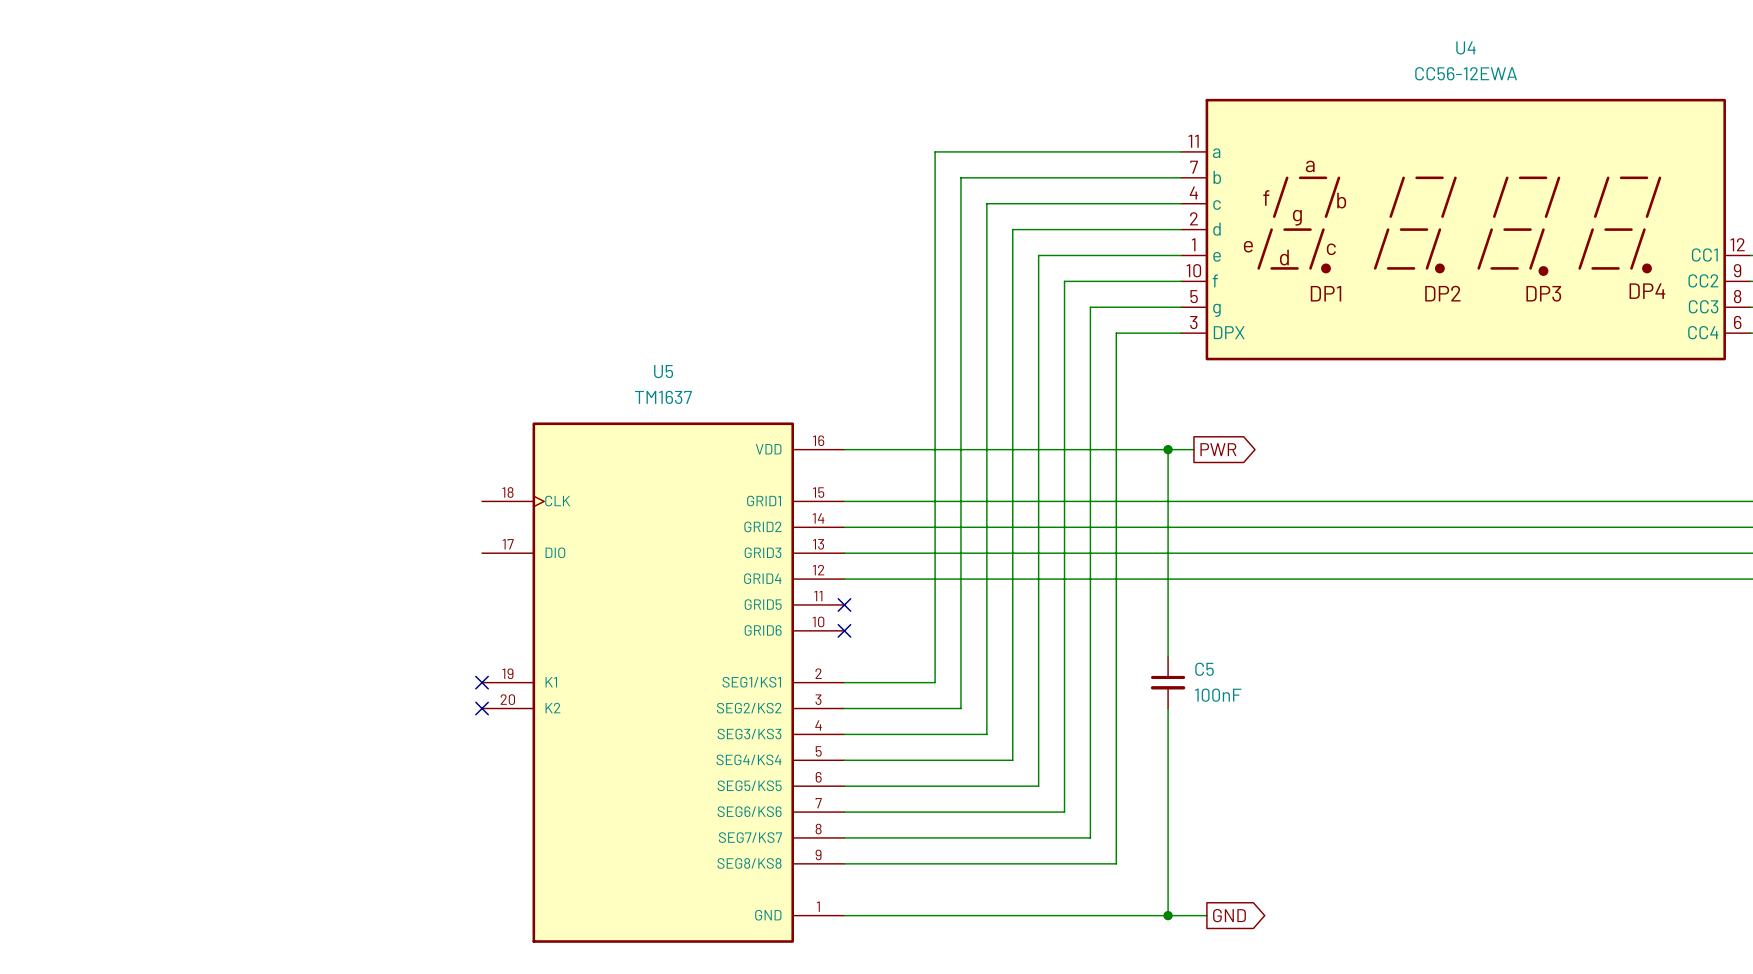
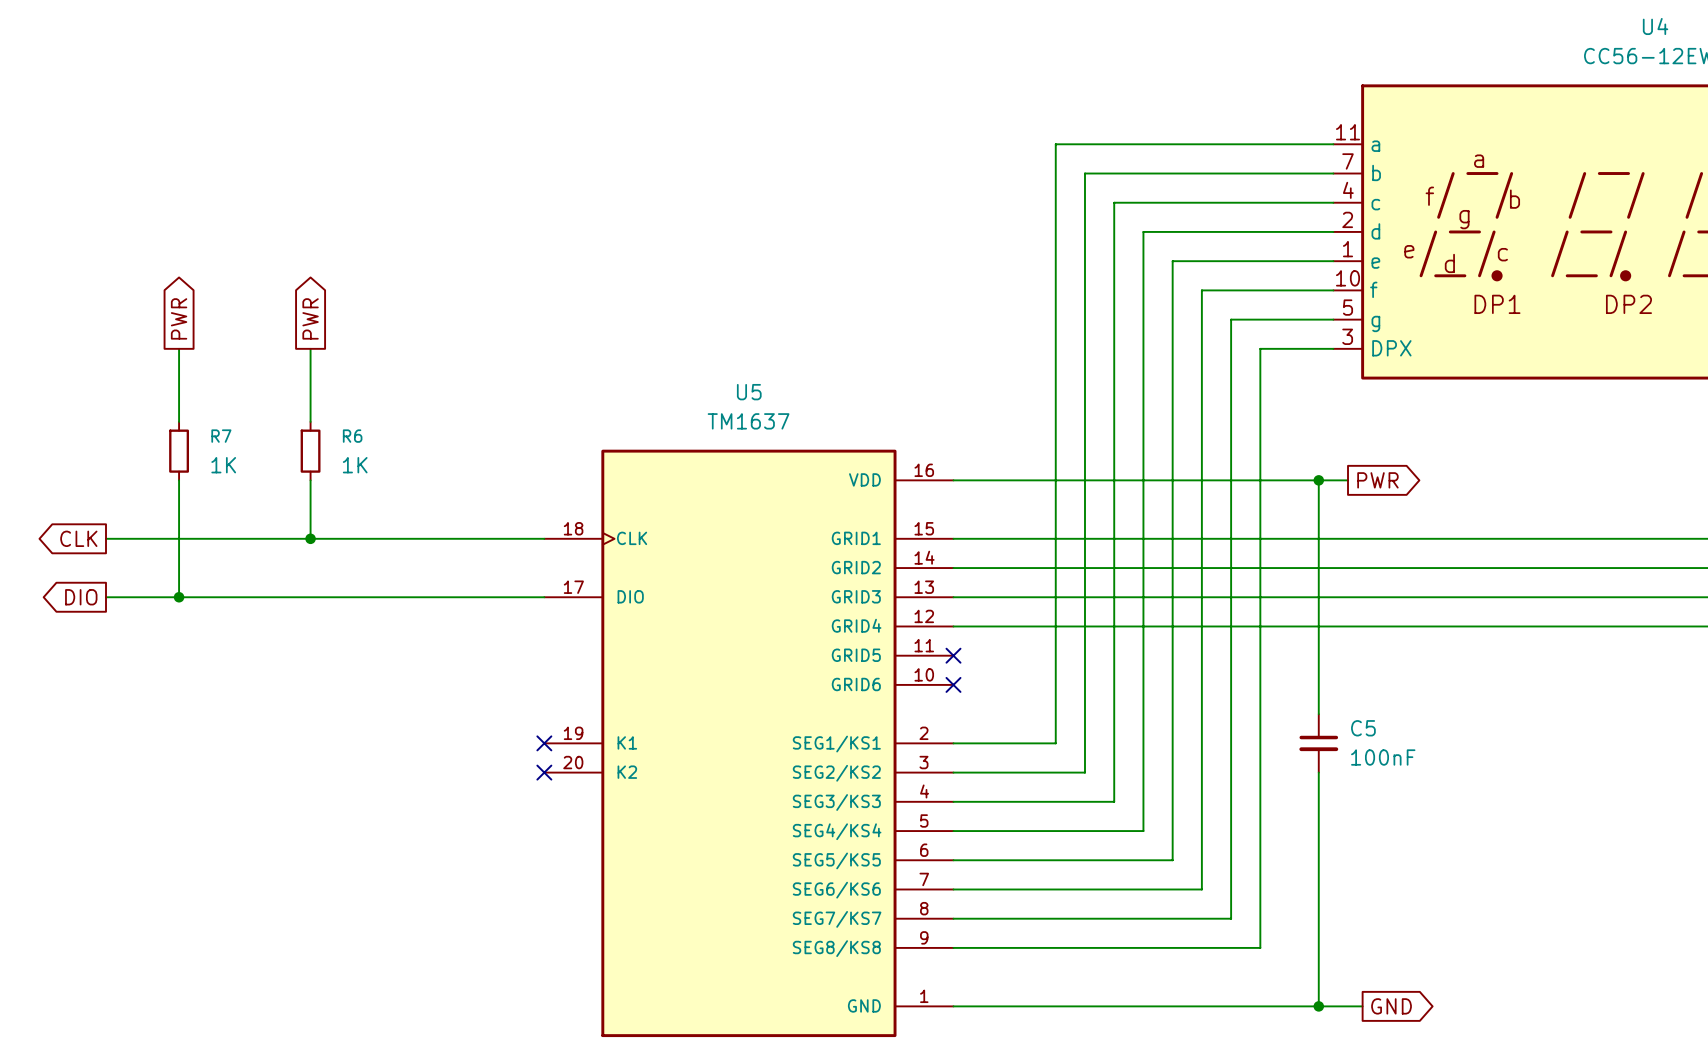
global label: none -> PWR (179, 318)
global label: none -> PWR (310, 318)
wire: none -> (179, 348) (179, 421)
wire: none -> (310, 348) (310, 421)
R7: none -> 1K (179, 451)
R6: none -> 1K (310, 451)
wire: none -> (179, 480) (179, 597)
wire: none -> (310, 480) (310, 538)
global label: none -> CLK (78, 538)
wire: none -> (106, 538) (544, 538)
junction: none -> (310, 538)
global label: none -> DIO (81, 597)
wire: none -> (106, 597) (544, 597)
junction: none -> (179, 597)

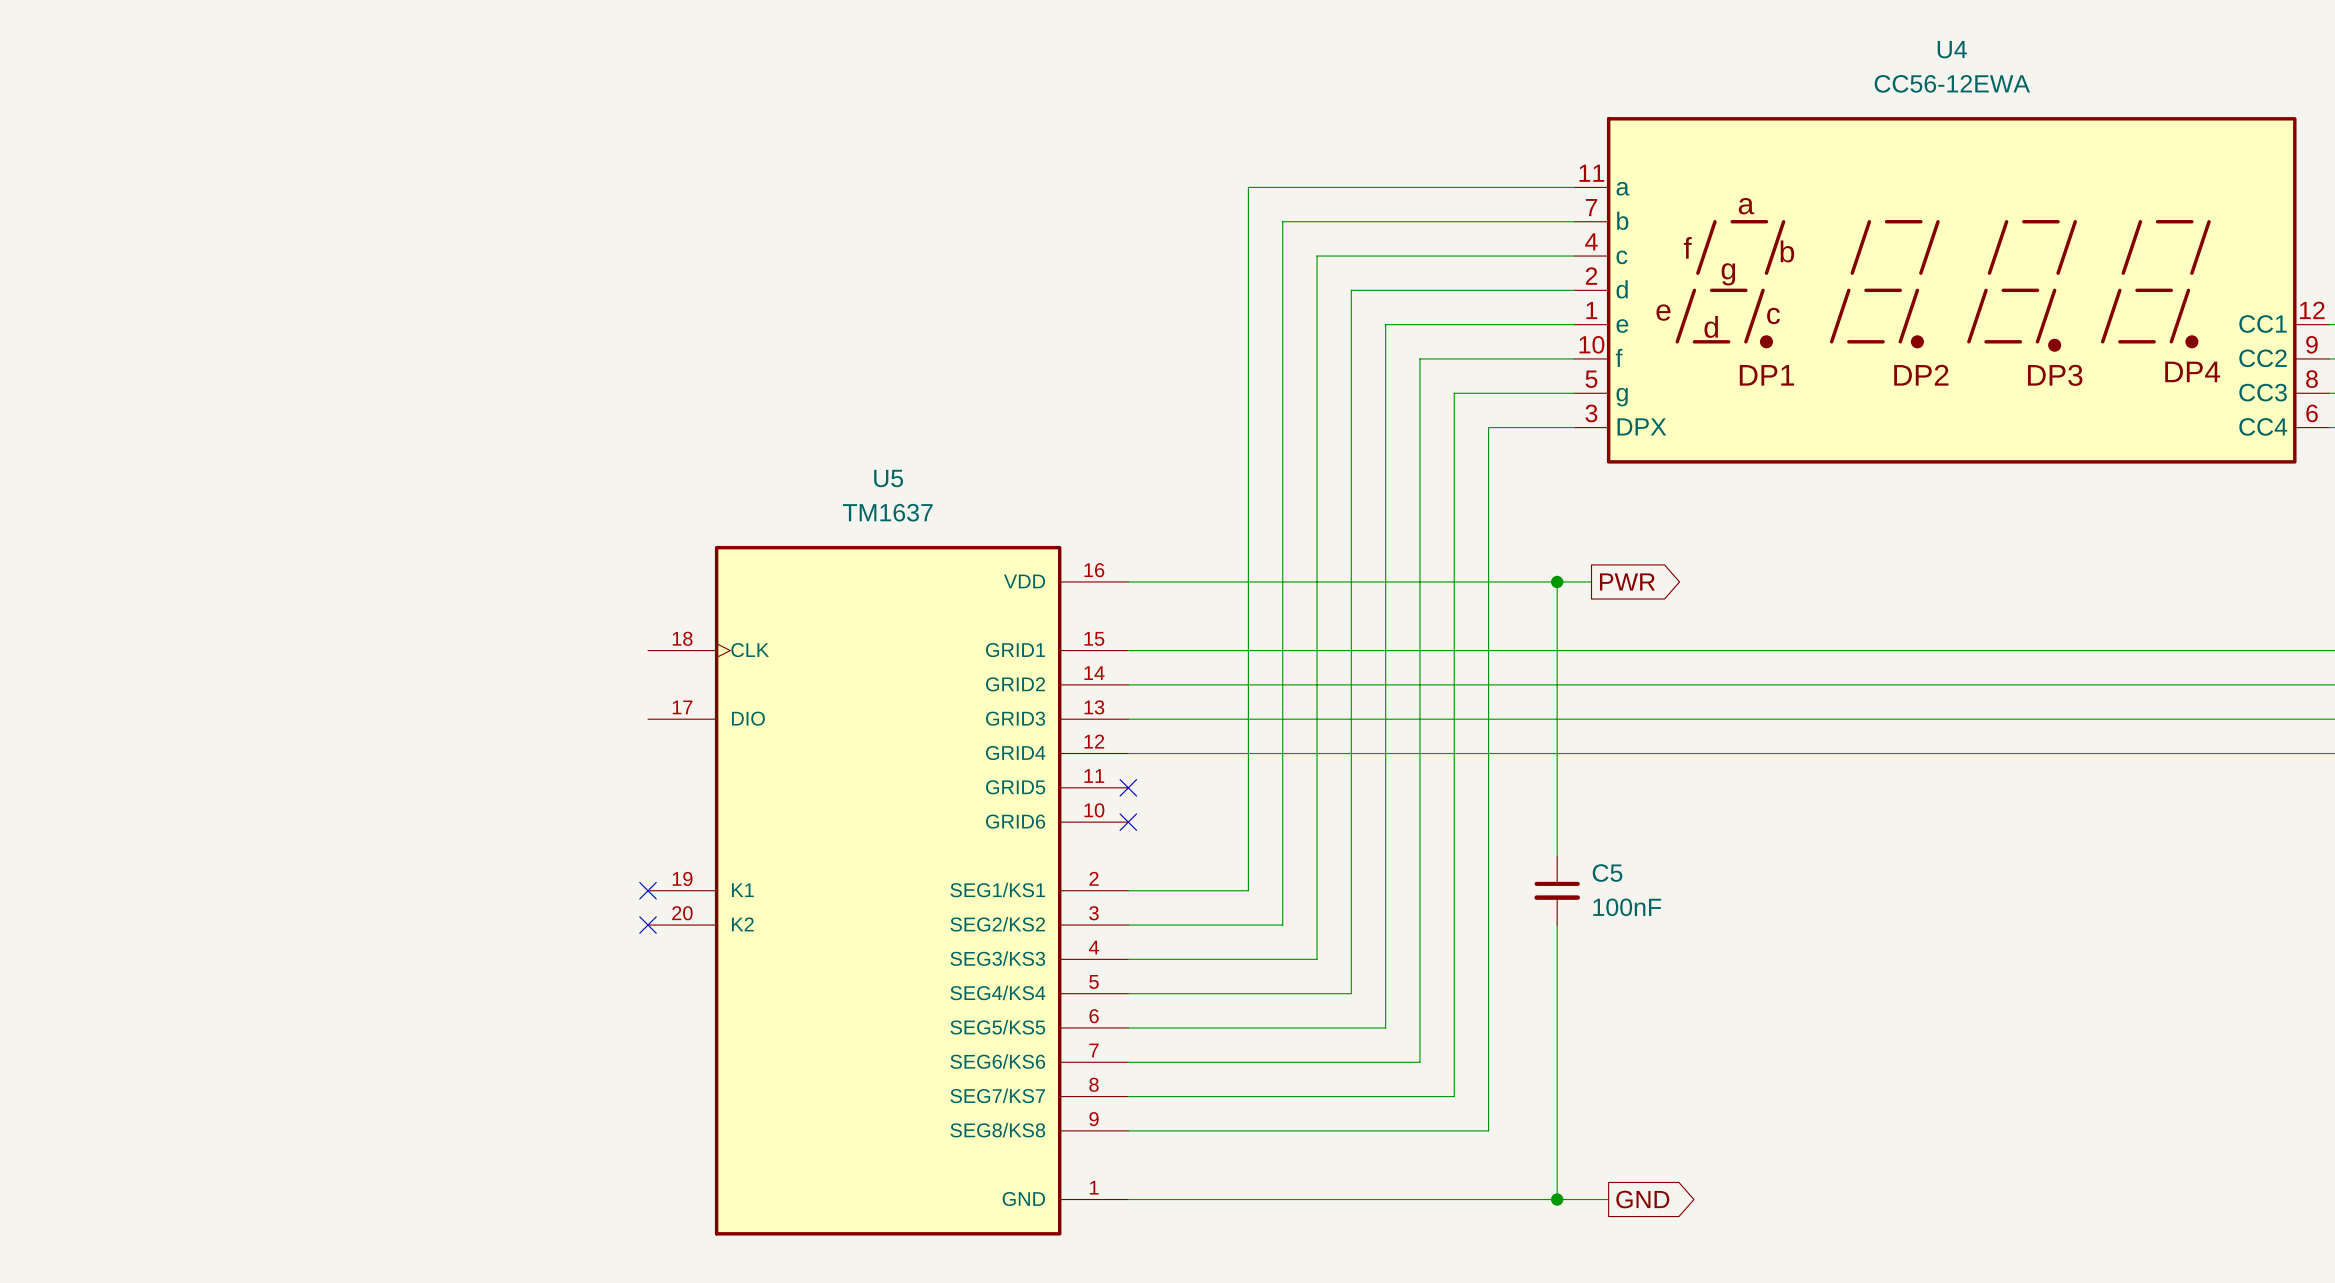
global label: PWR (179, 318) -> none
global label: PWR (310, 318) -> none
wire: (179, 348) (179, 421) -> none
wire: (310, 348) (310, 421) -> none
R7: 1K (179, 451) -> none
R6: 1K (310, 451) -> none
wire: (179, 480) (179, 597) -> none
wire: (310, 480) (310, 538) -> none
global label: CLK (78, 538) -> none
wire: (106, 538) (544, 538) -> none
junction: (310, 538) -> none
global label: DIO (81, 597) -> none
wire: (106, 597) (544, 597) -> none
junction: (179, 597) -> none

